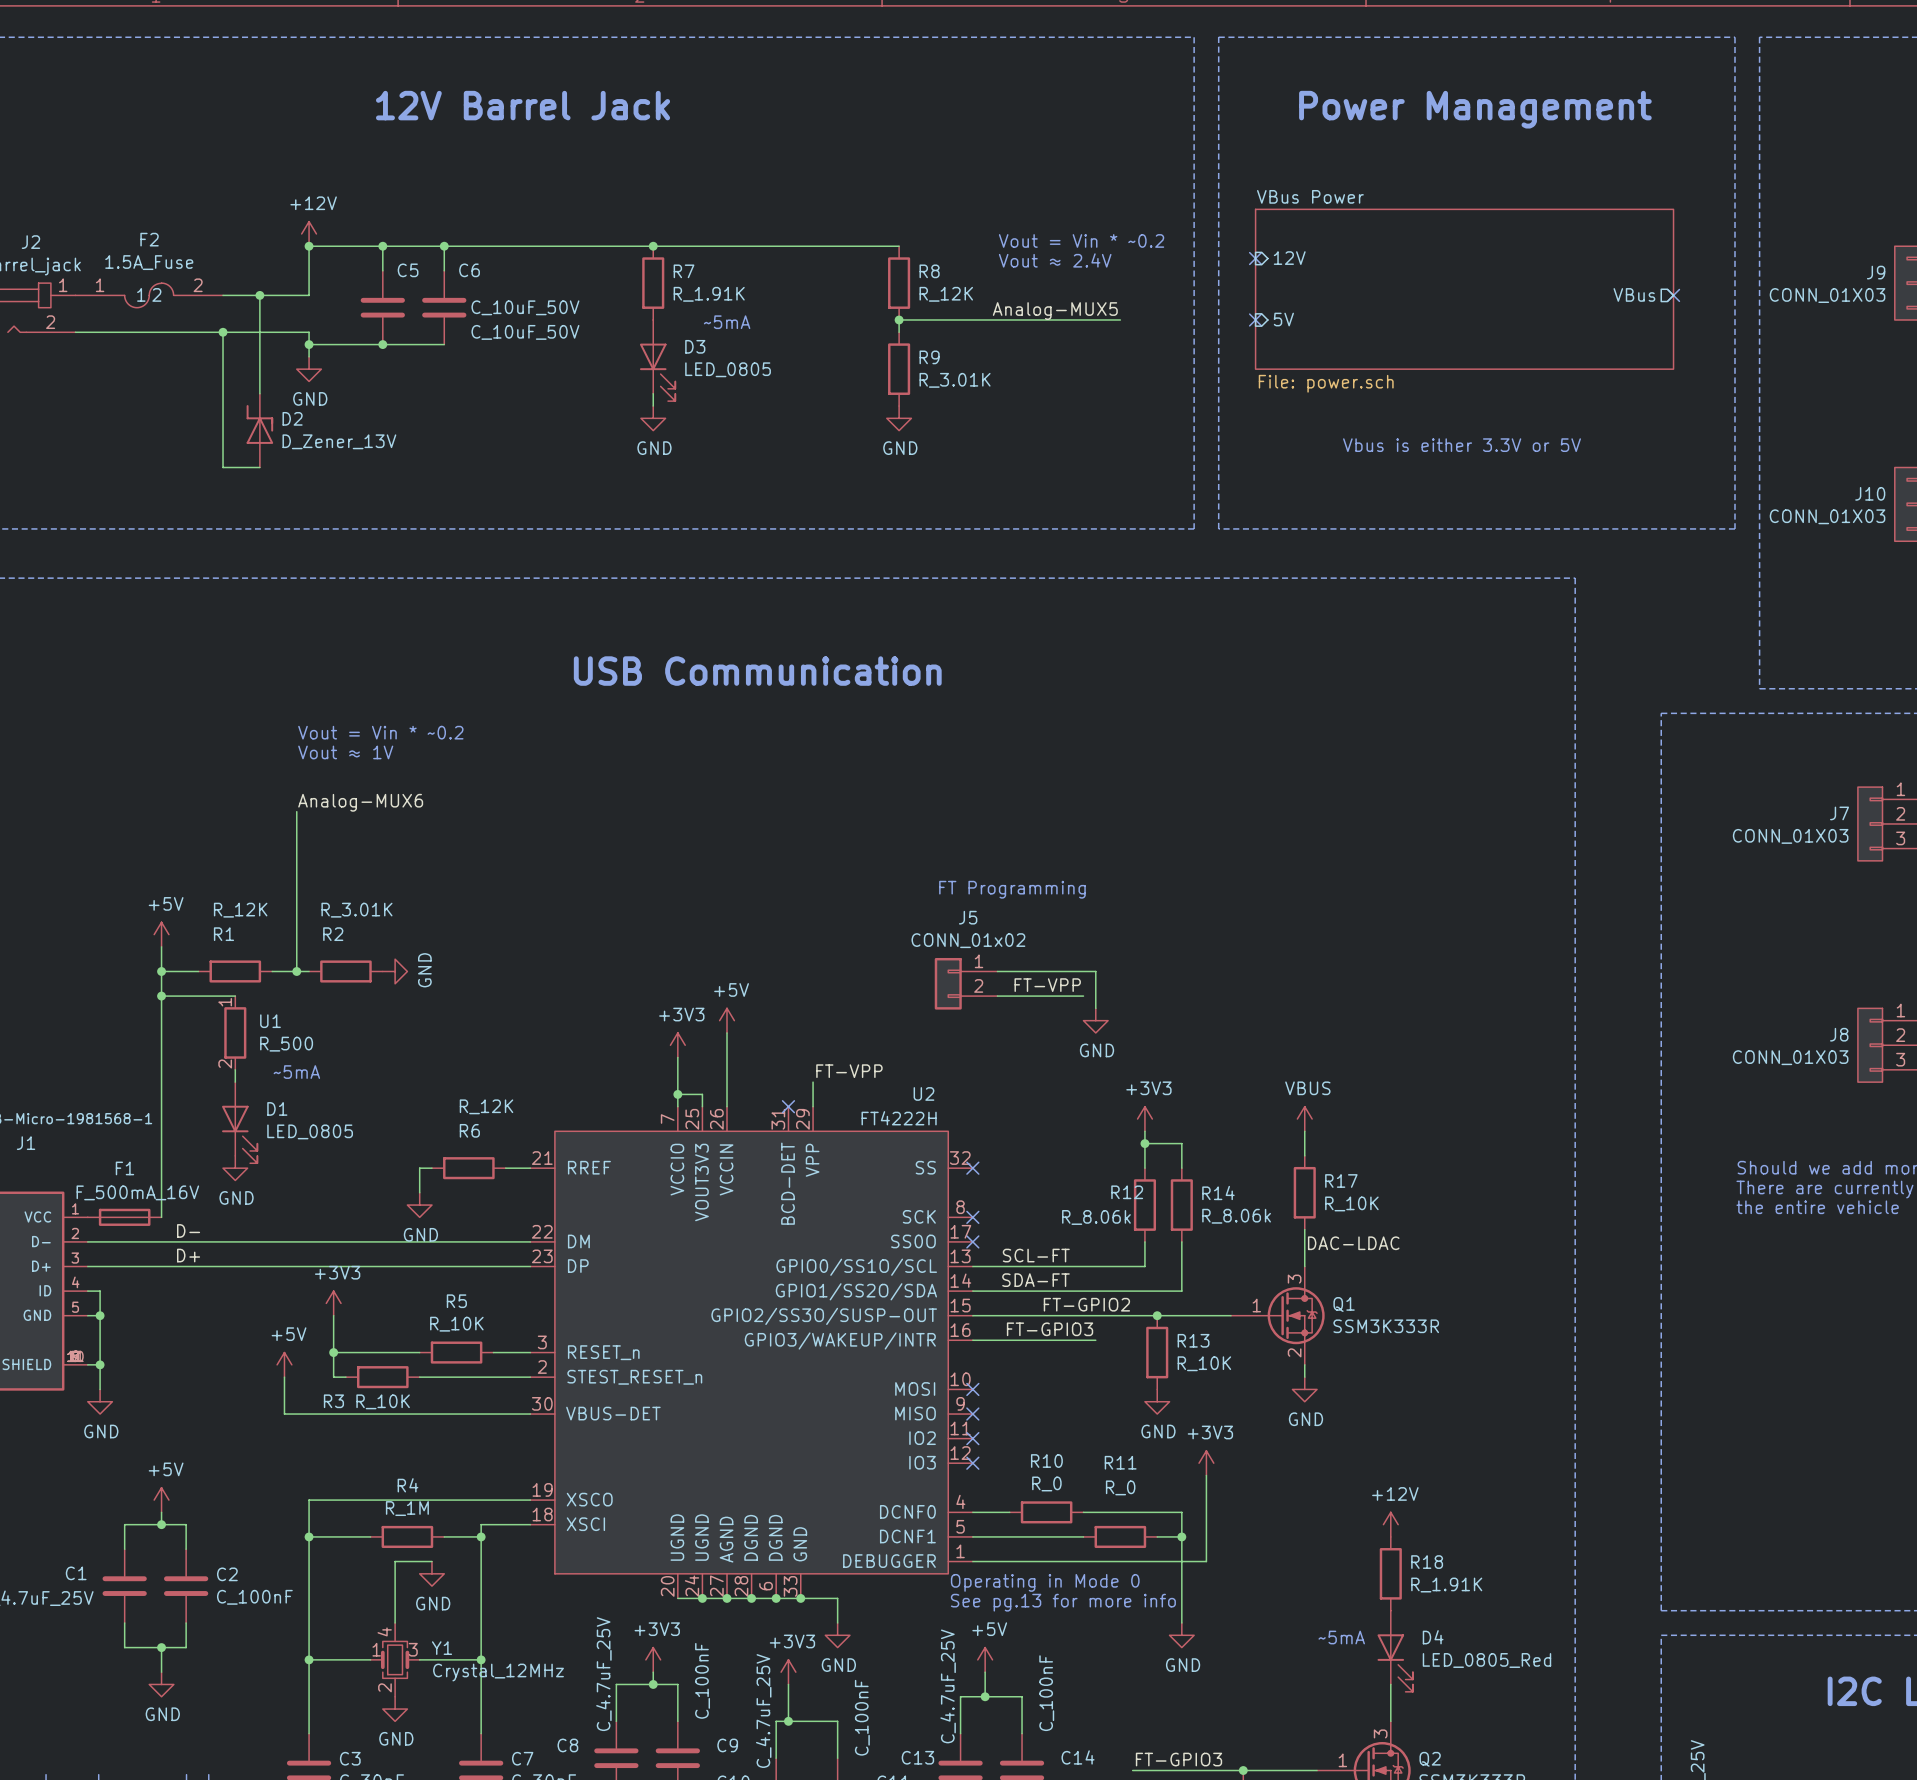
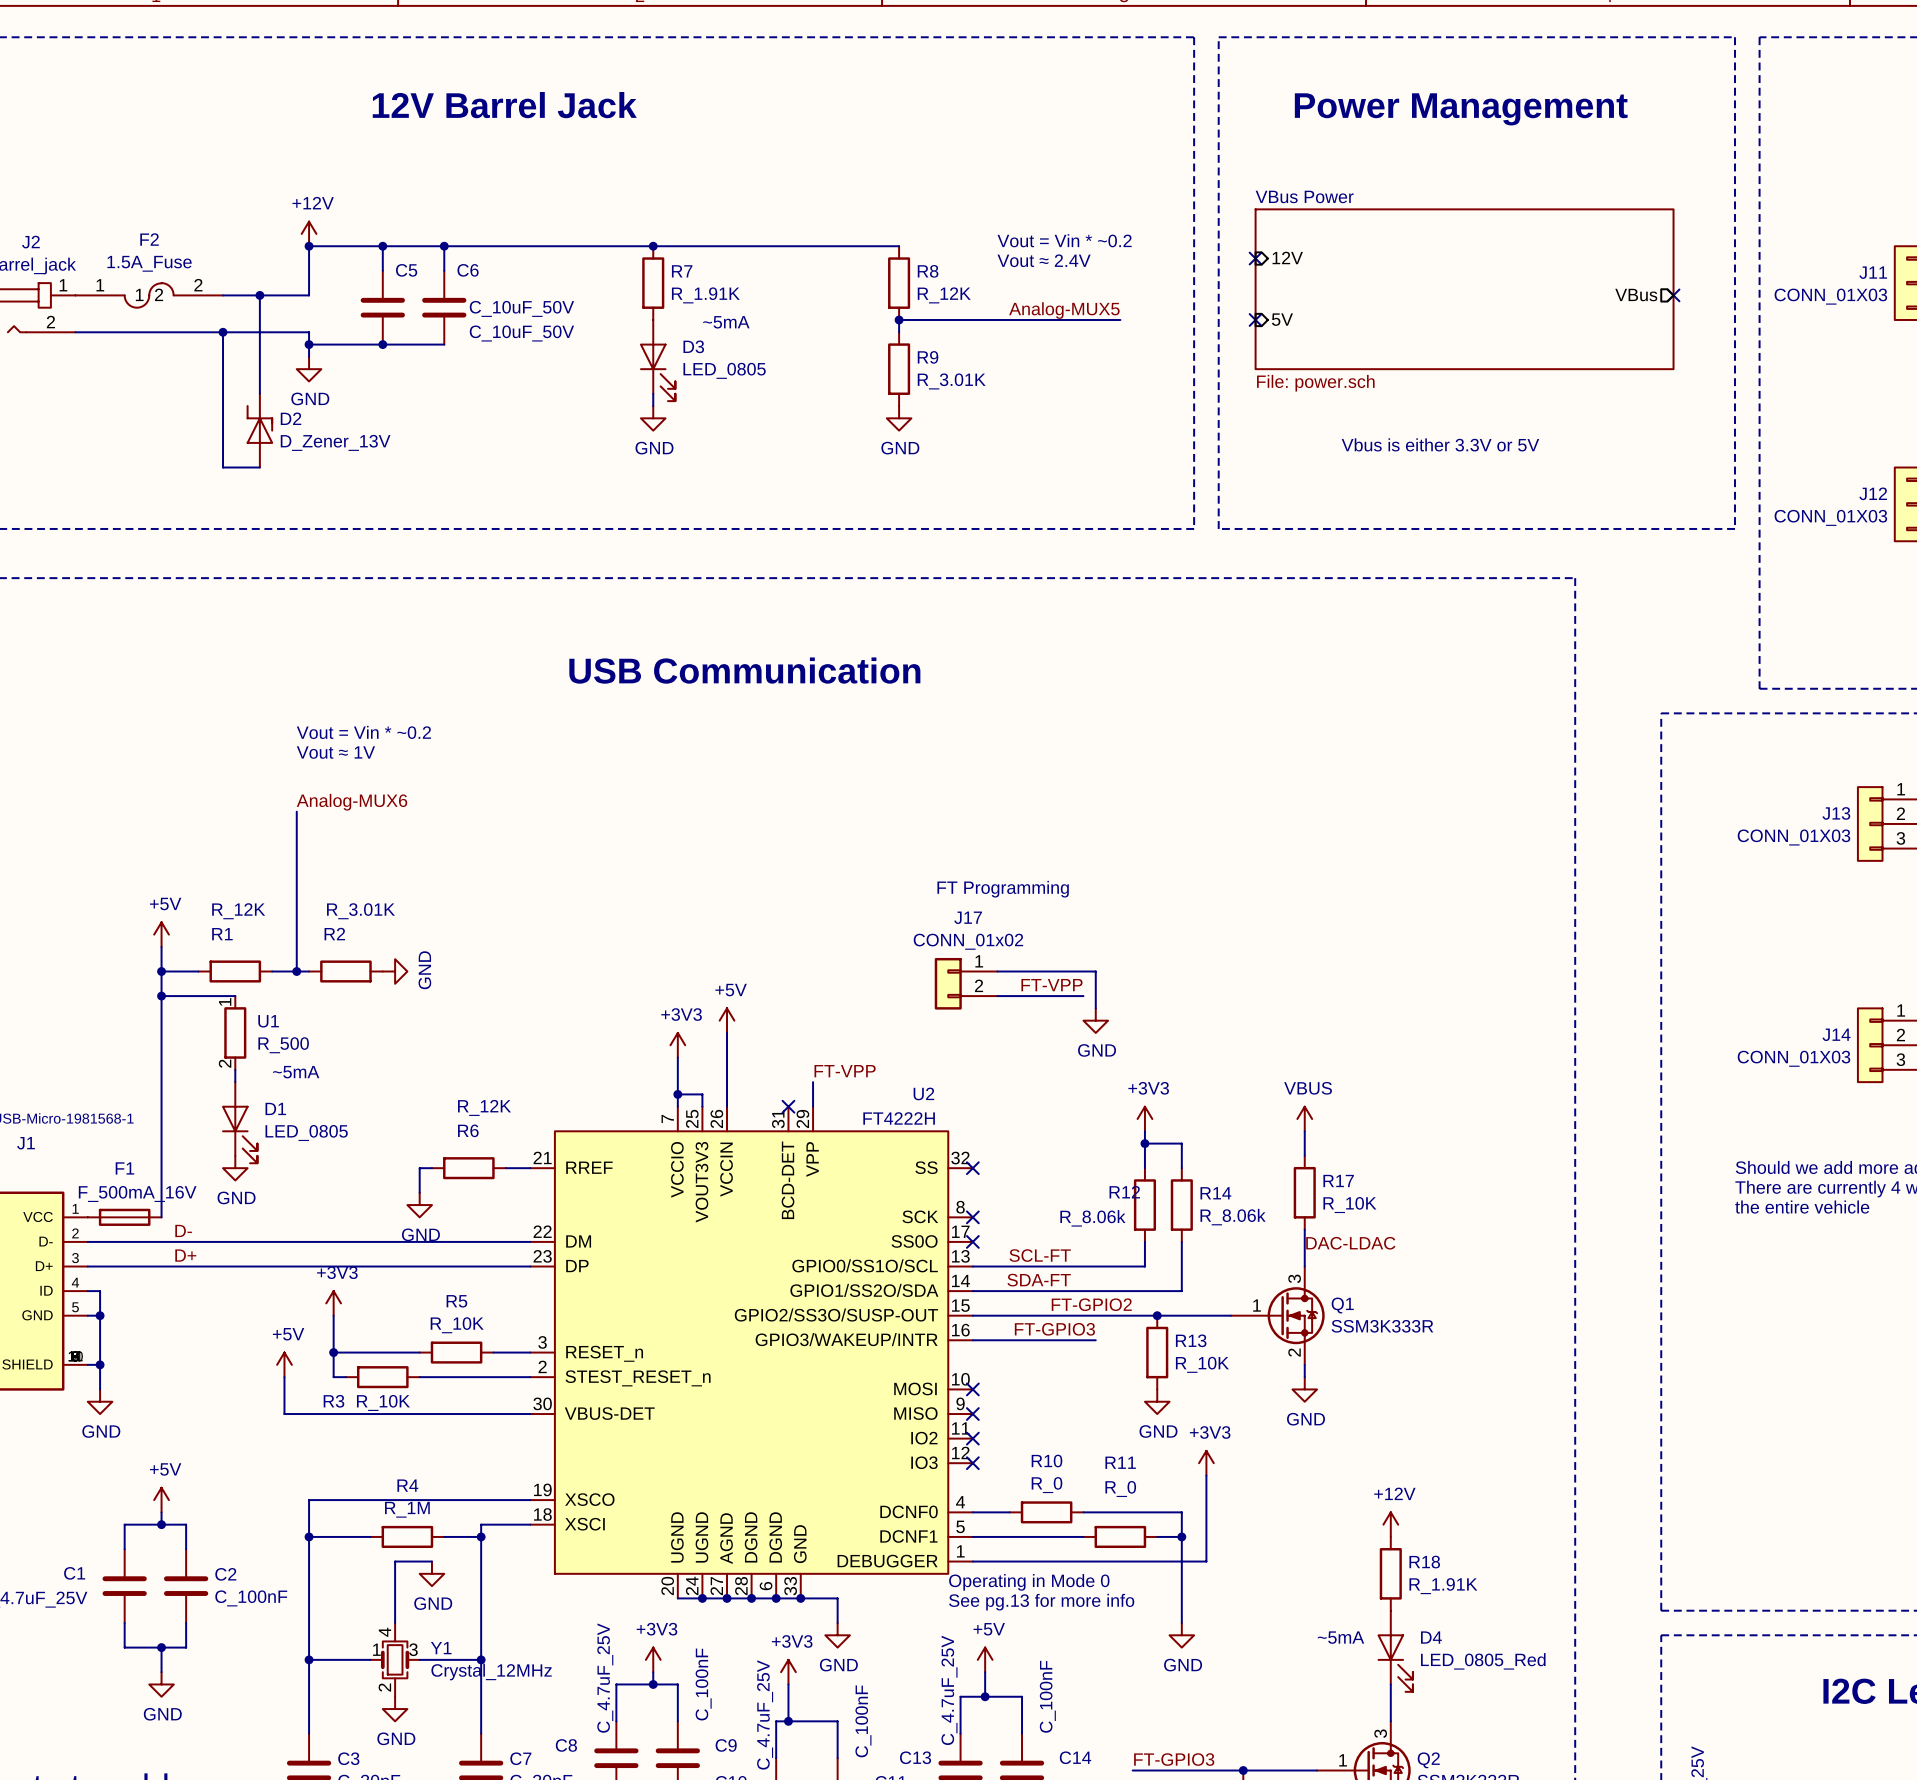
J9 name: J9 (1876, 272) -> J11 (1873, 272)
J10 name: J10 (1870, 493) -> J12 (1873, 493)
J7 name: J7 (1839, 813) -> J13 (1836, 813)
J5 name: J5 (968, 917) -> J17 (968, 917)
J8 name: J8 (1839, 1034) -> J14 (1836, 1034)

